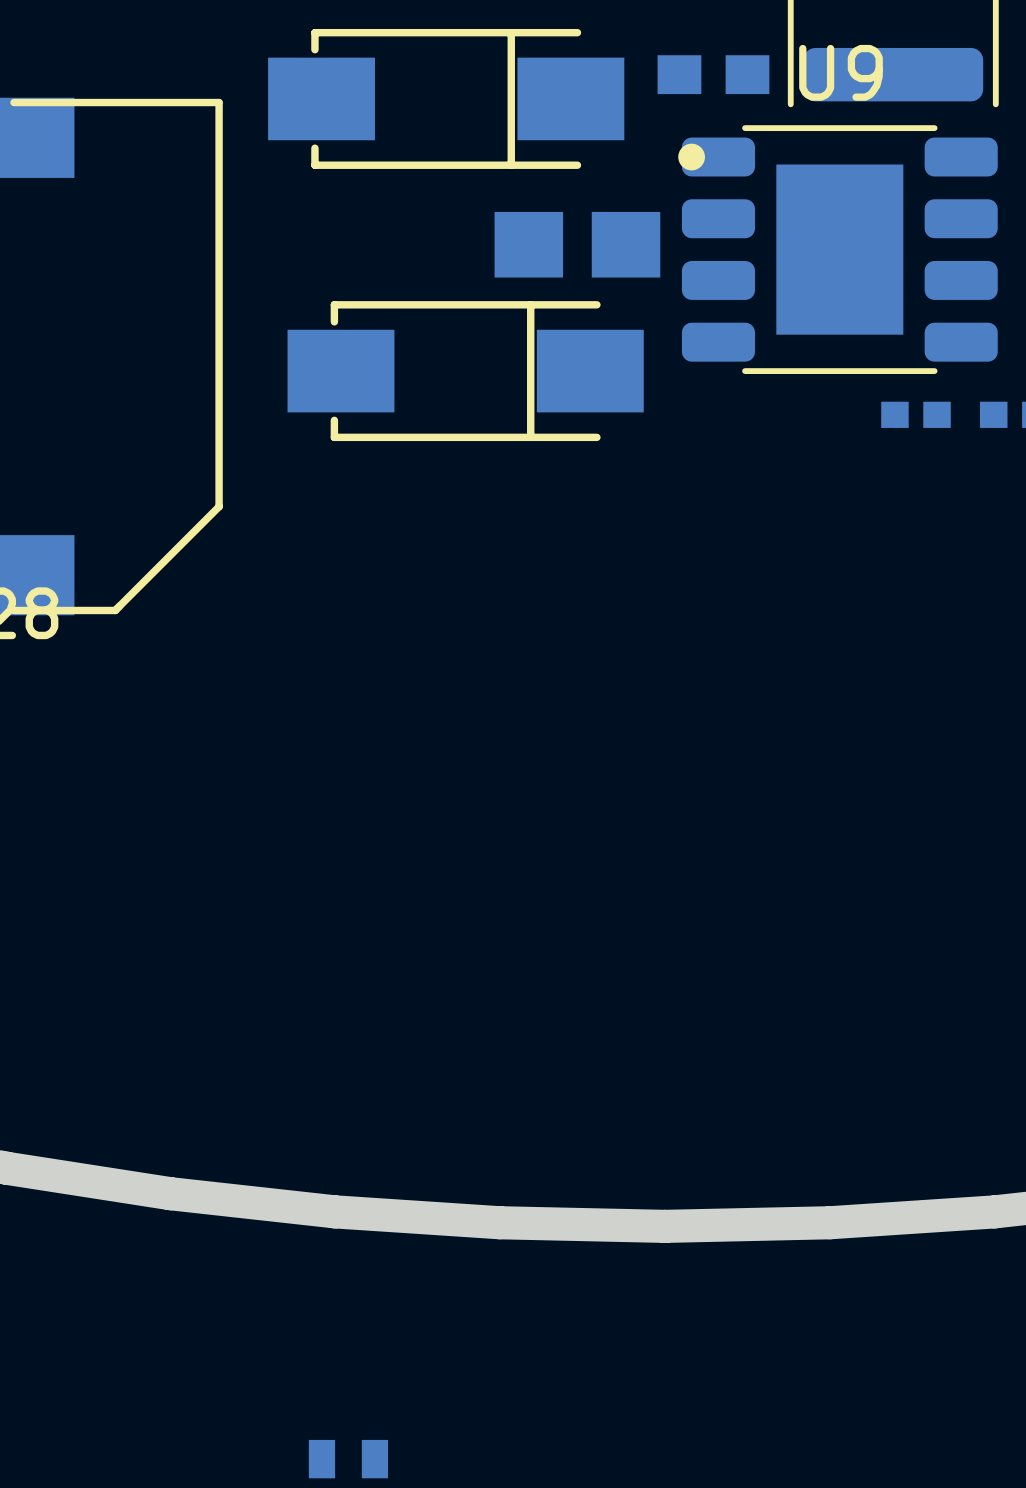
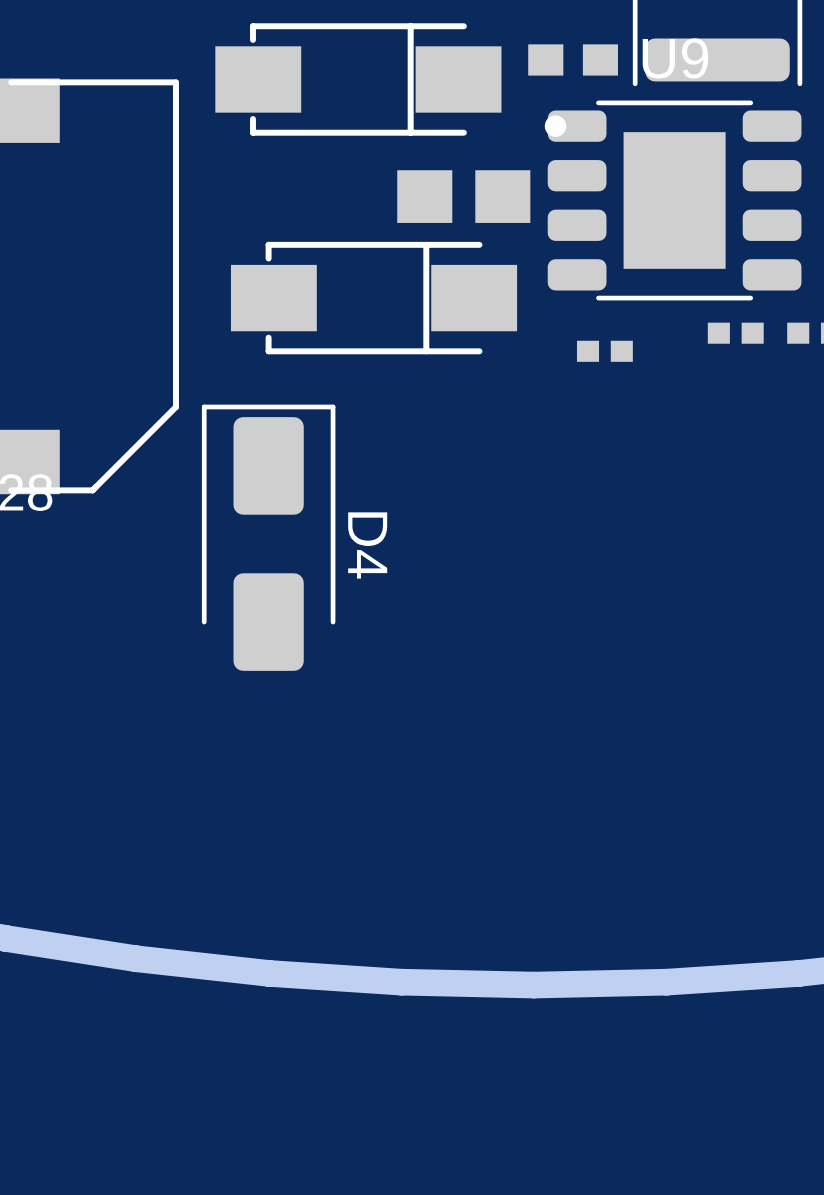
part: none -> (604, 351)
D4: none -> (268, 537)
part: (348, 1459) -> none

